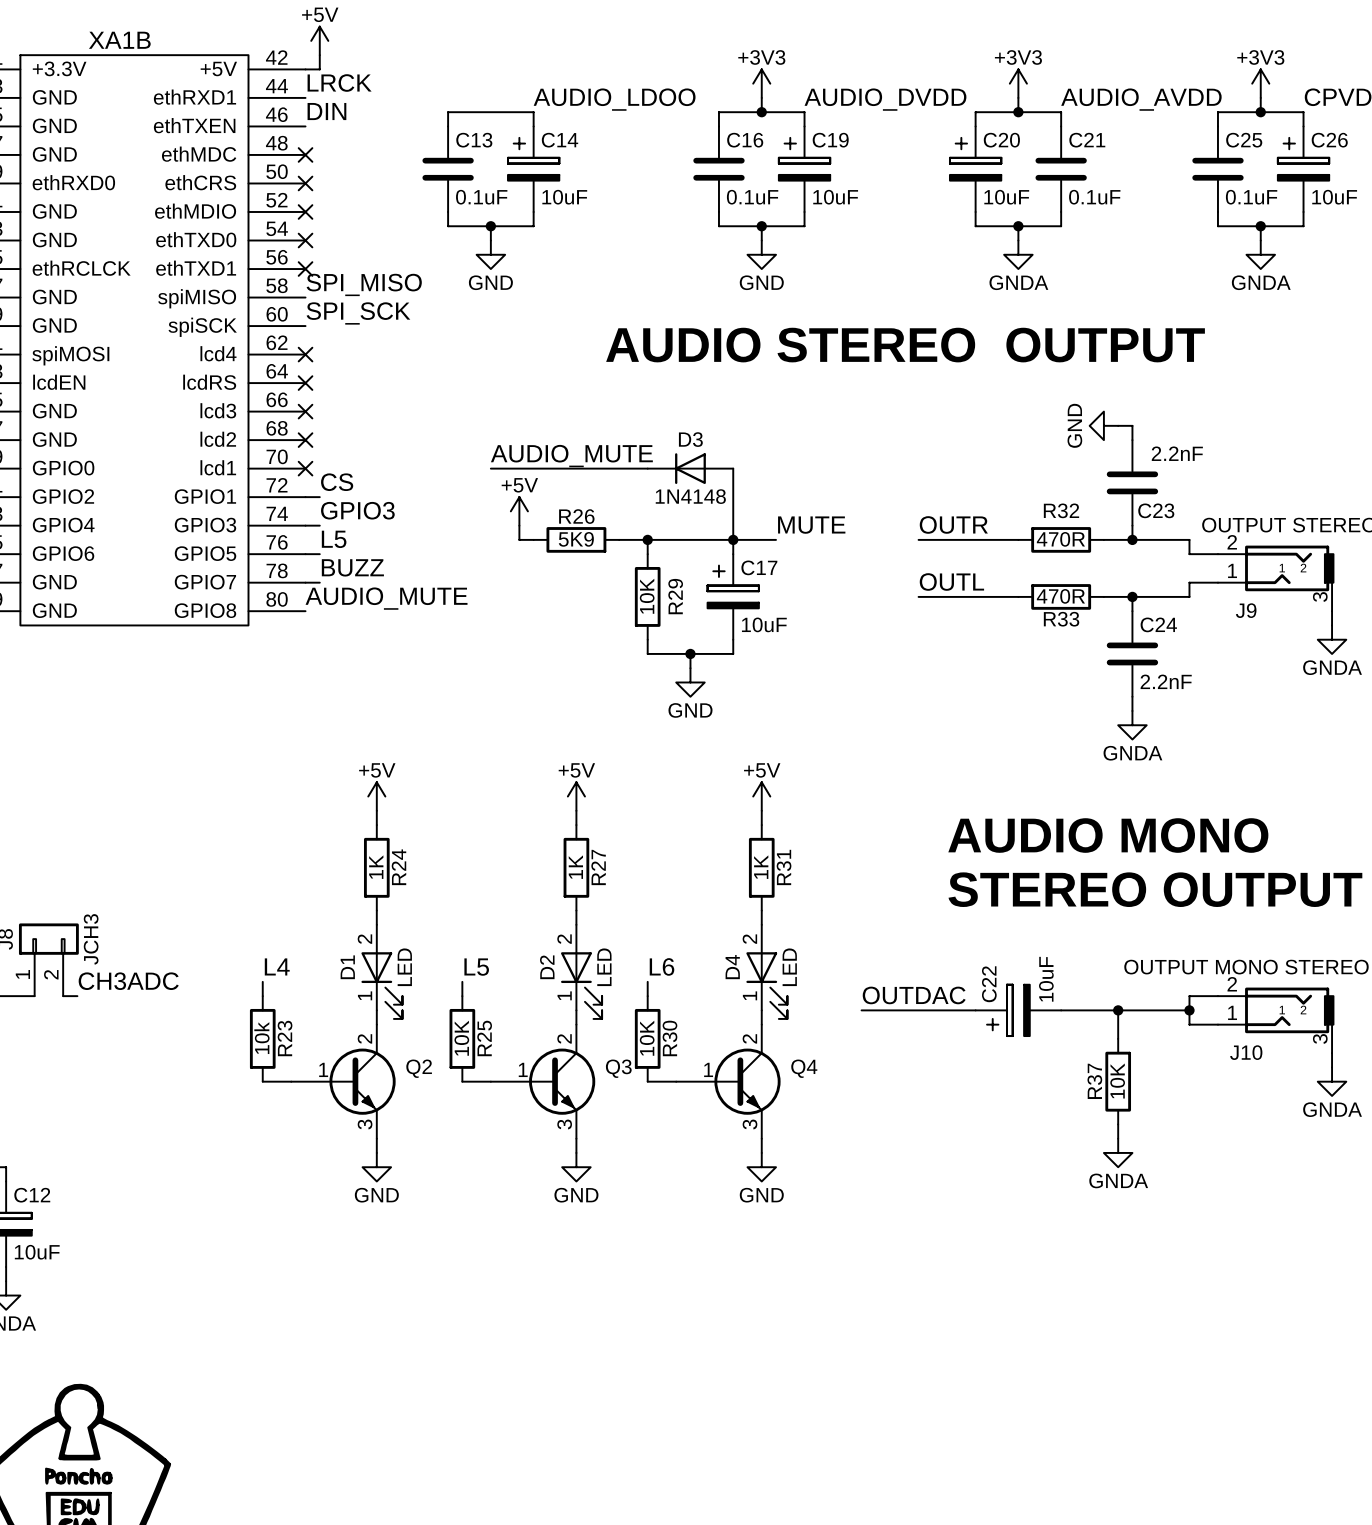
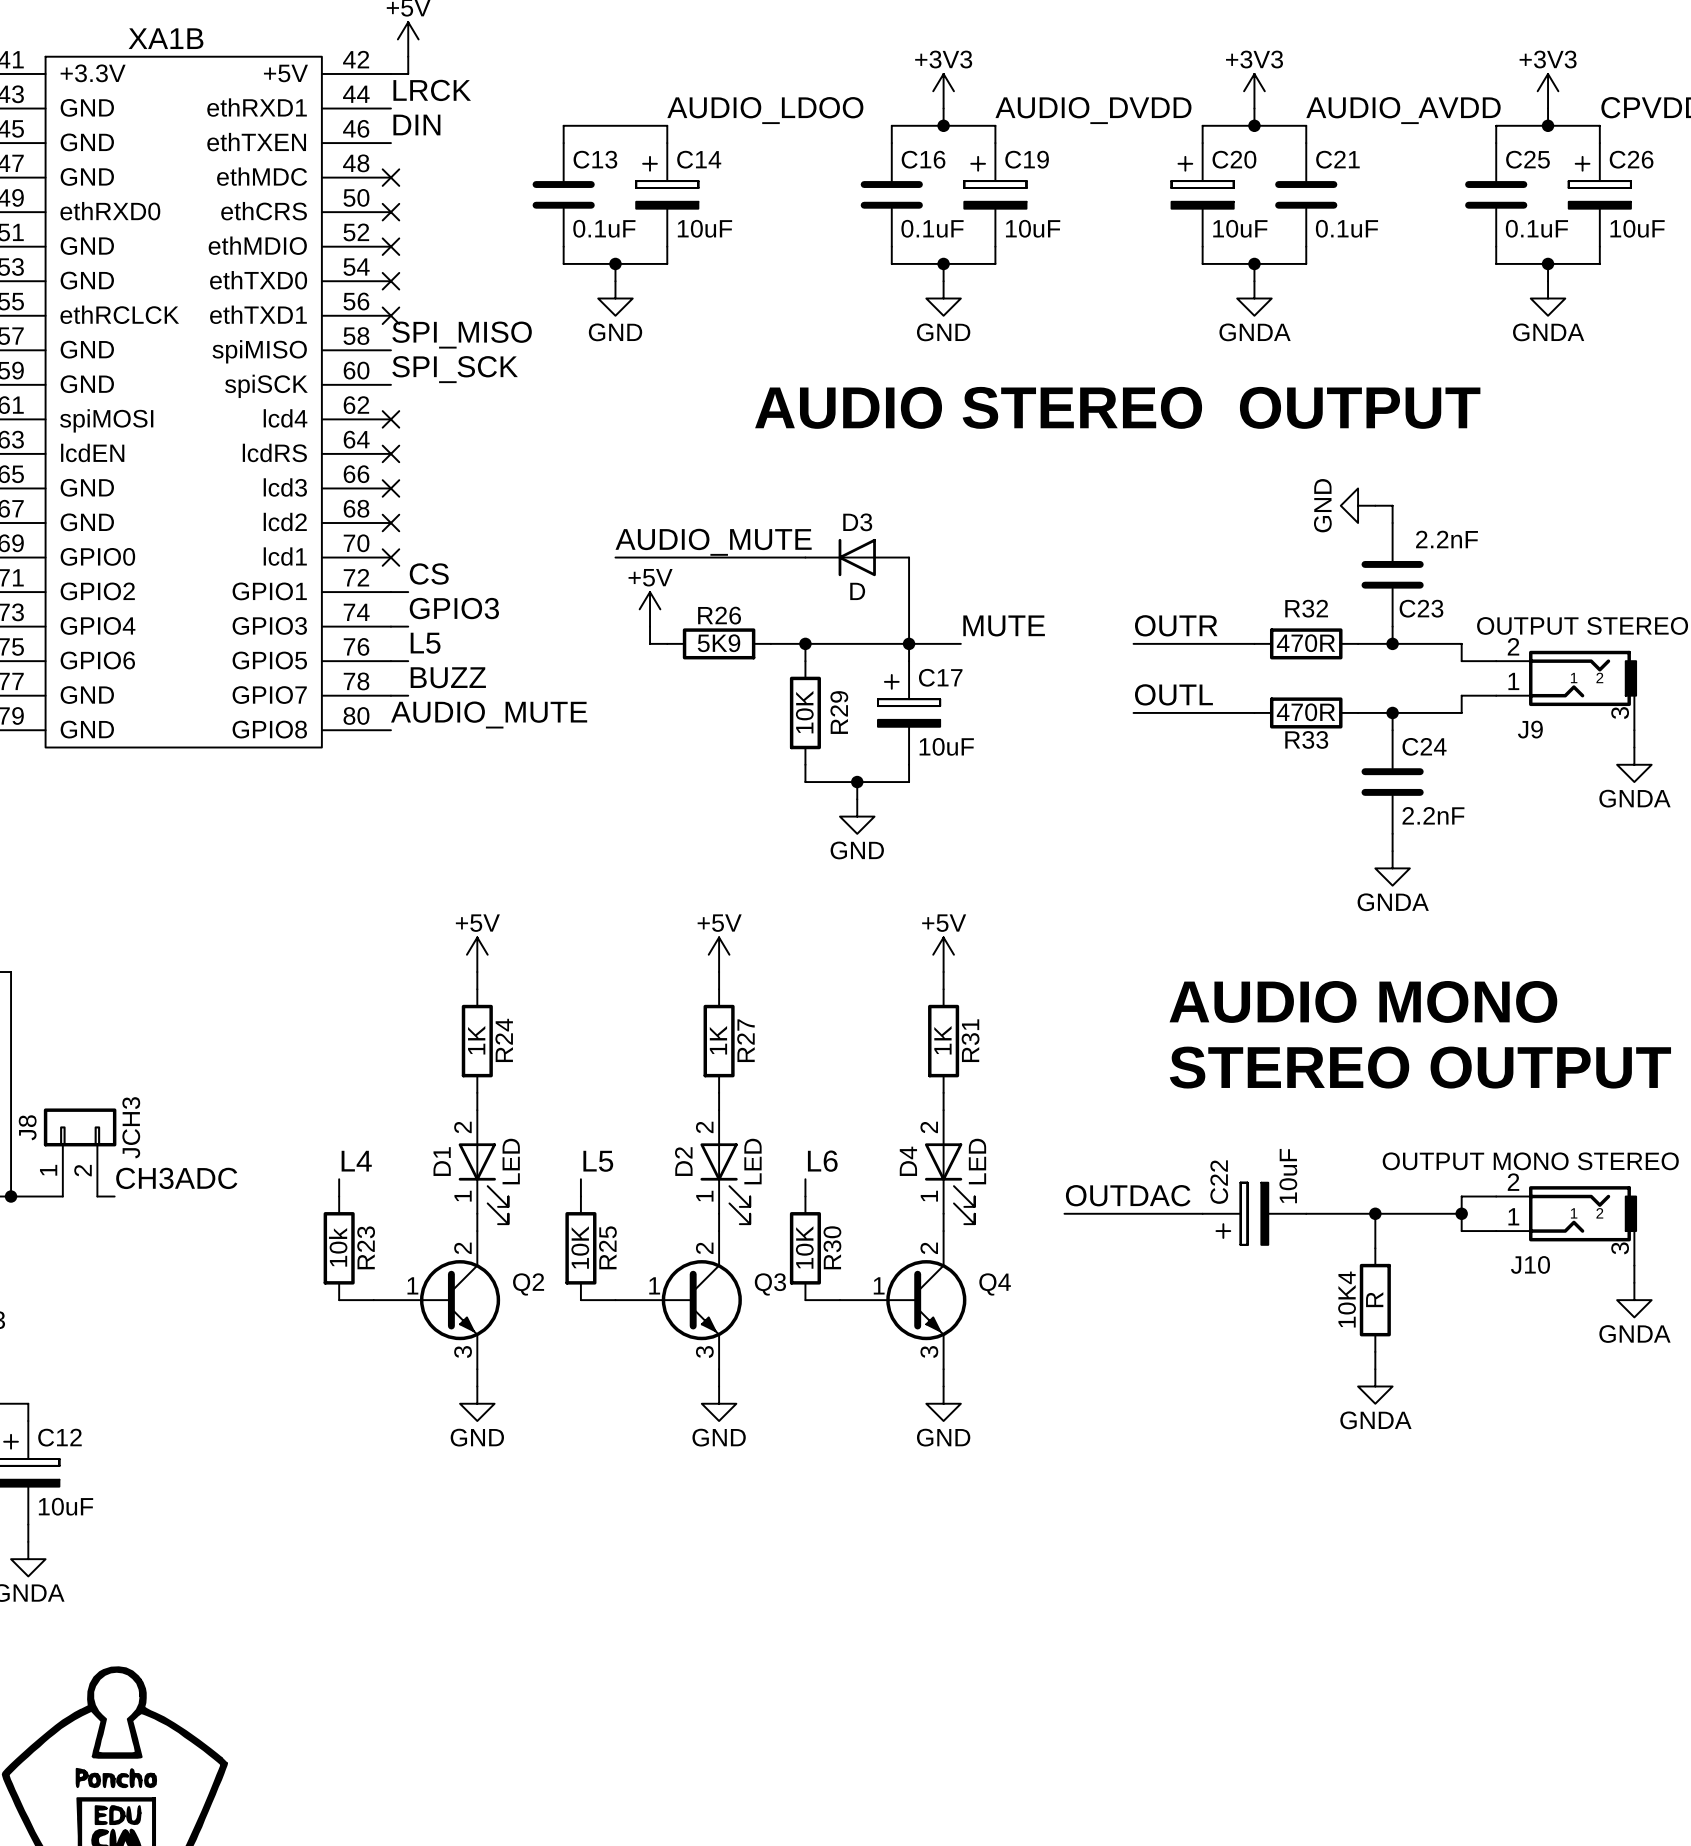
D3 value: 1N4148 (690, 496) -> D (857, 591)
R37 name: R37 (1094, 1081) -> 10K4 (1347, 1299)
R37 value: 10K (1117, 1081) -> R (1374, 1299)

